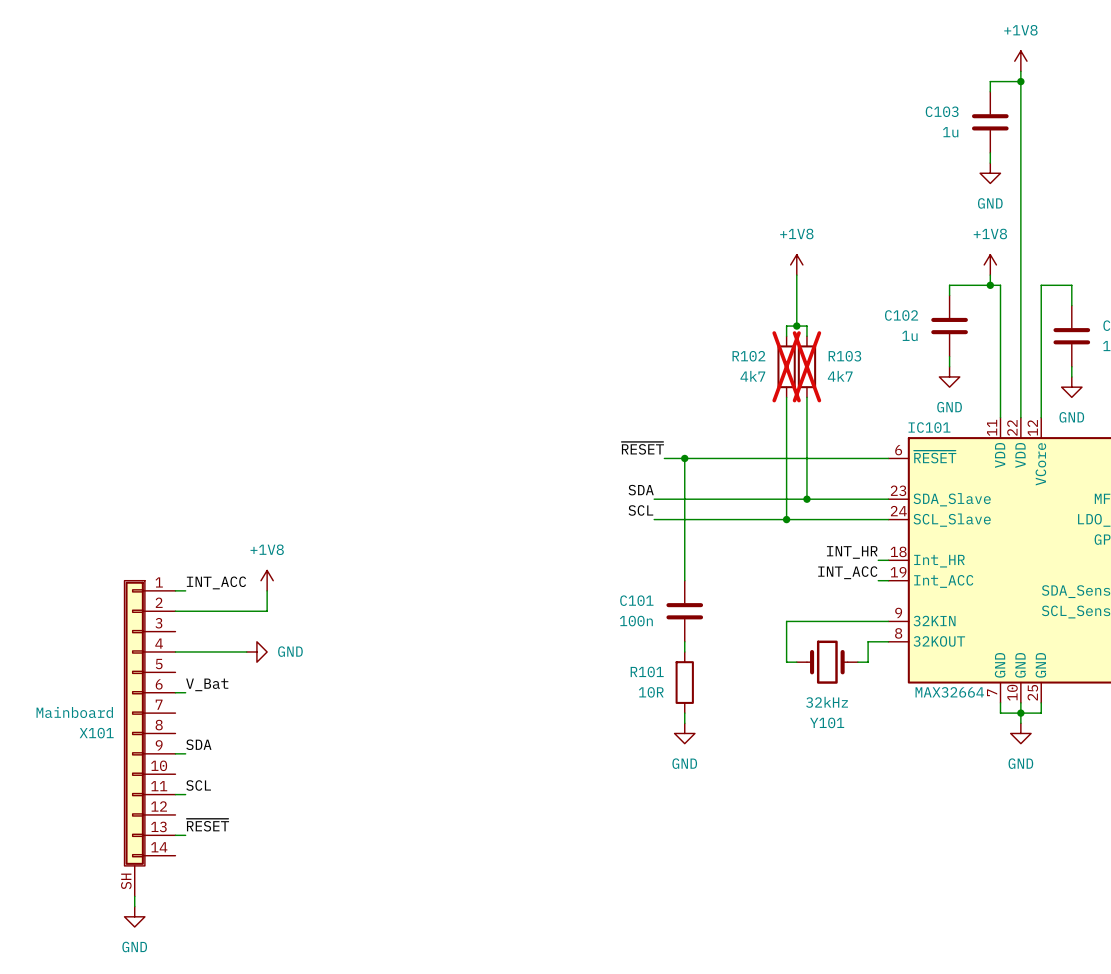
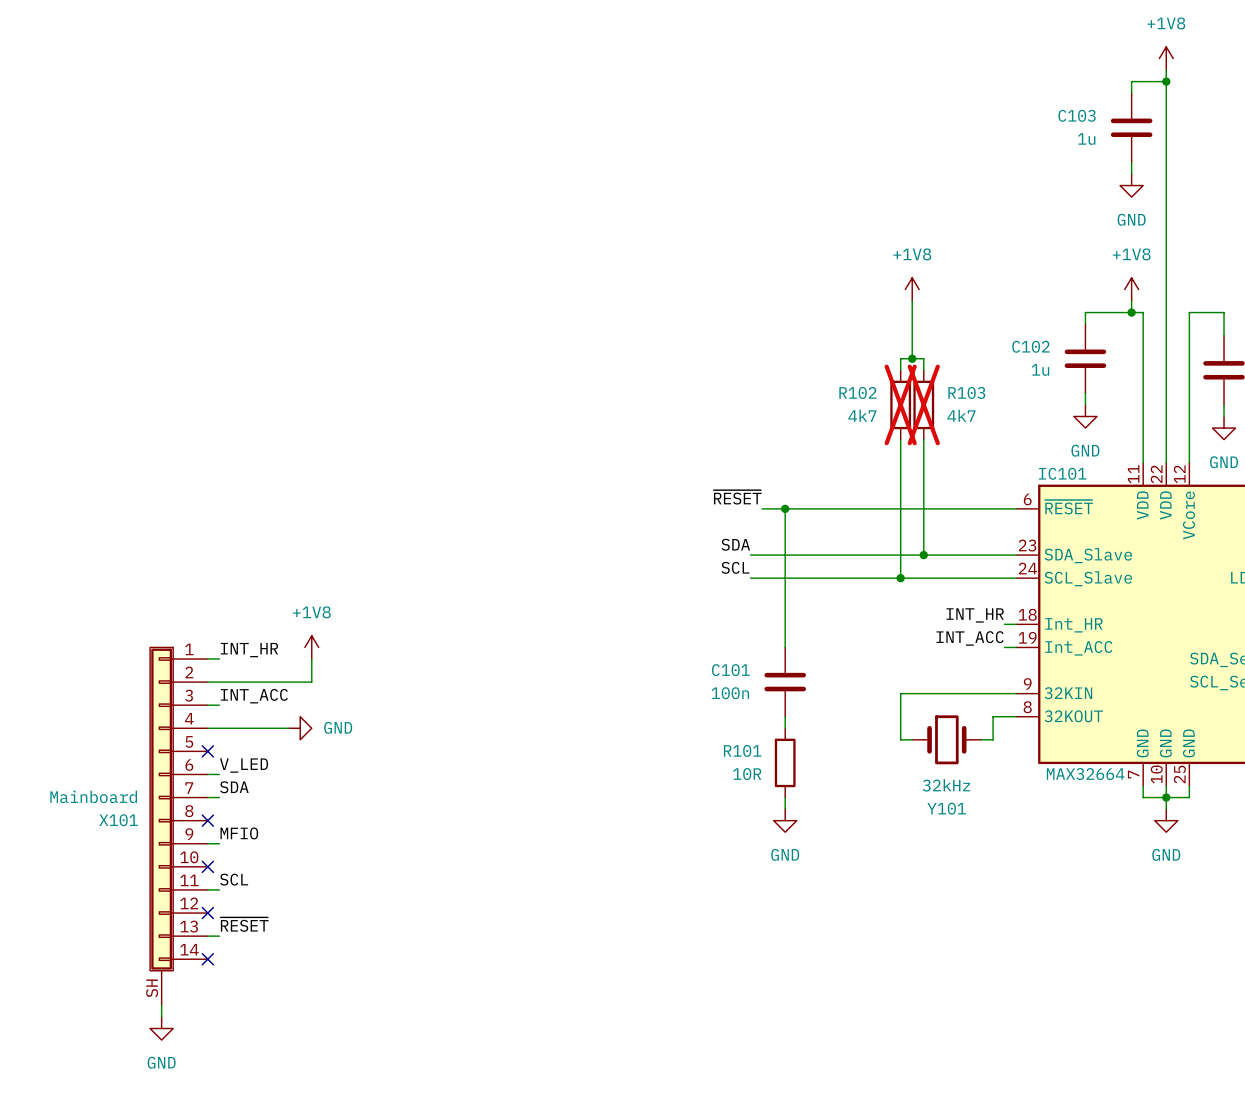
label: INT_ACC (216, 582) -> INT_HR (249, 650)
label: none -> INT_ACC (254, 696)
wire: none -> (207, 705) (219, 705)
no-connect mark: none -> (207, 751)
label: V_Bat (207, 684) -> V_LED (244, 765)
label: none -> SDA (234, 787)
wire: none -> (207, 797) (219, 797)
no-connect mark: none -> (207, 820)
label: SDA (198, 744) -> MFIO (239, 833)
no-connect mark: none -> (207, 866)
no-connect mark: none -> (207, 913)
no-connect mark: none -> (207, 959)

